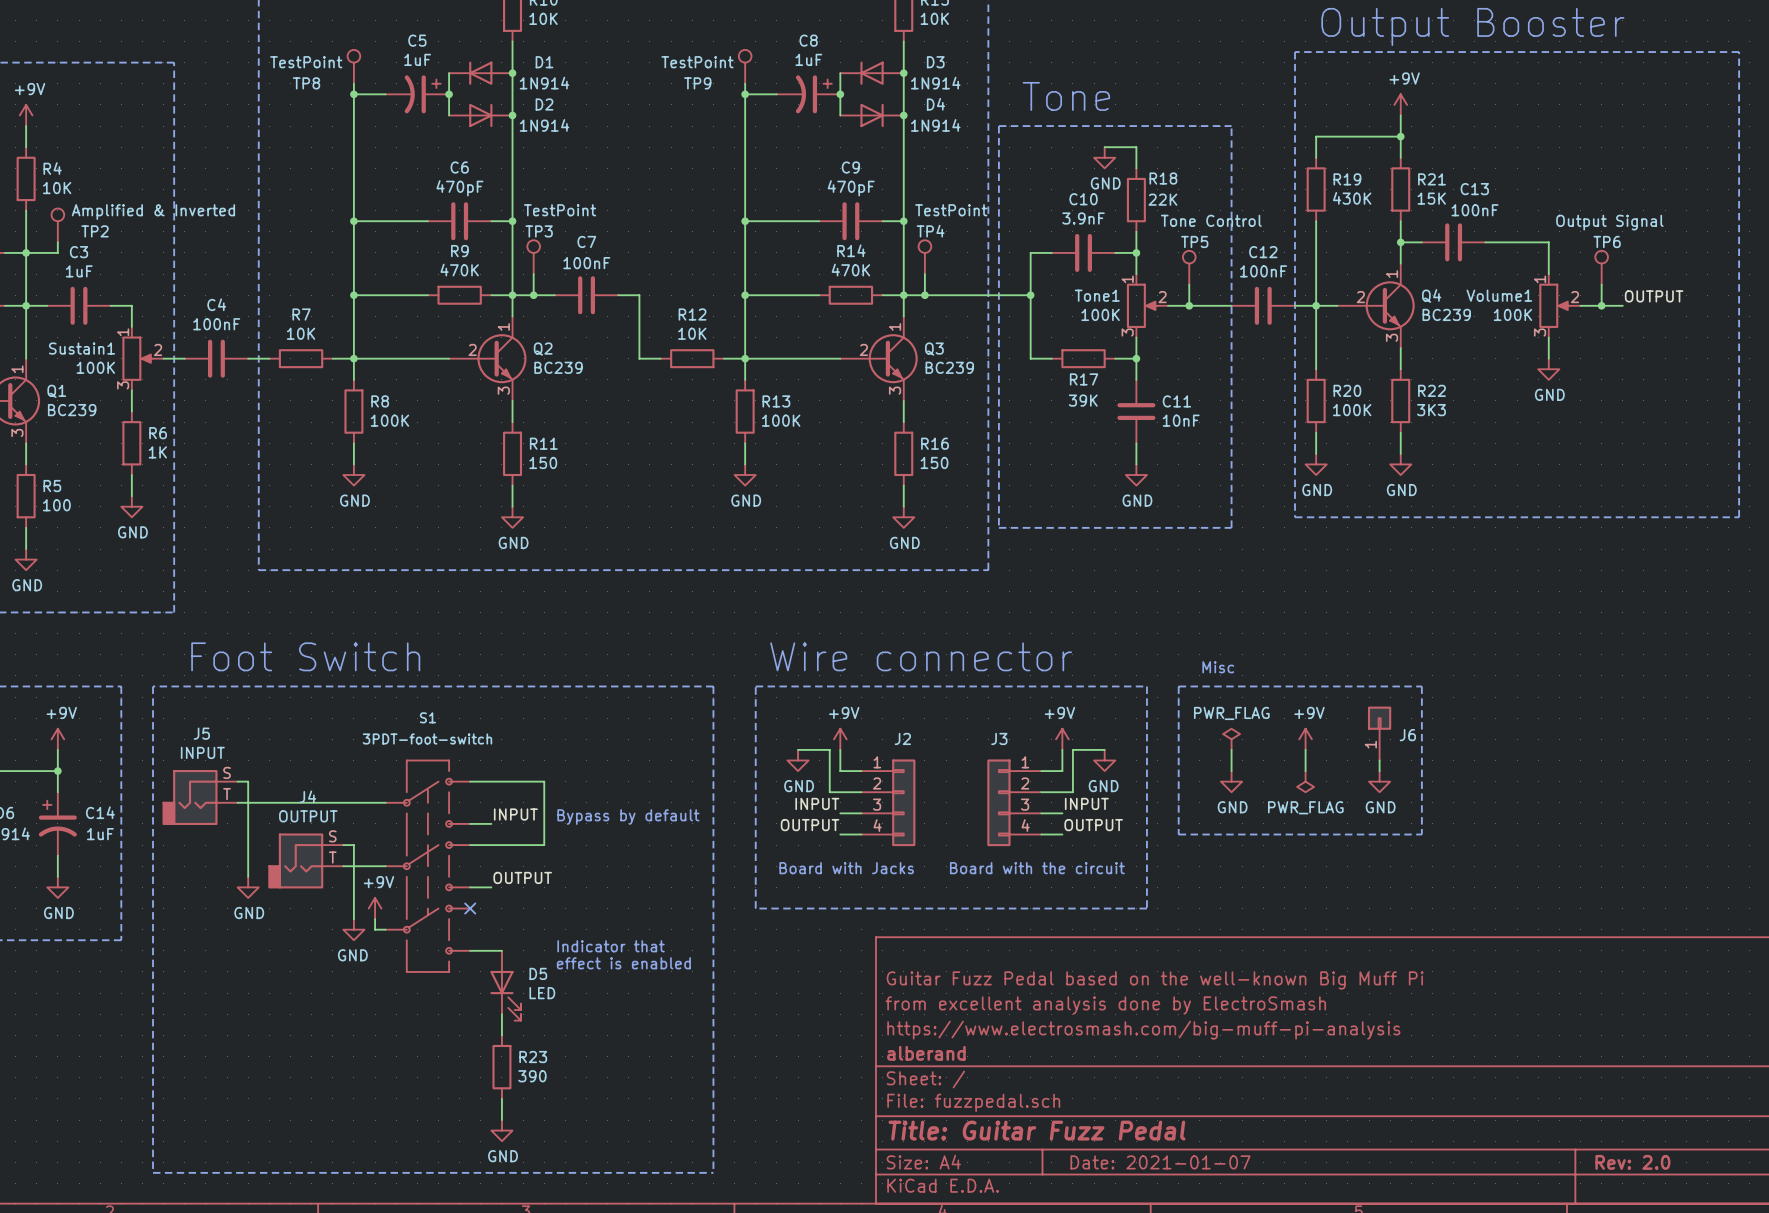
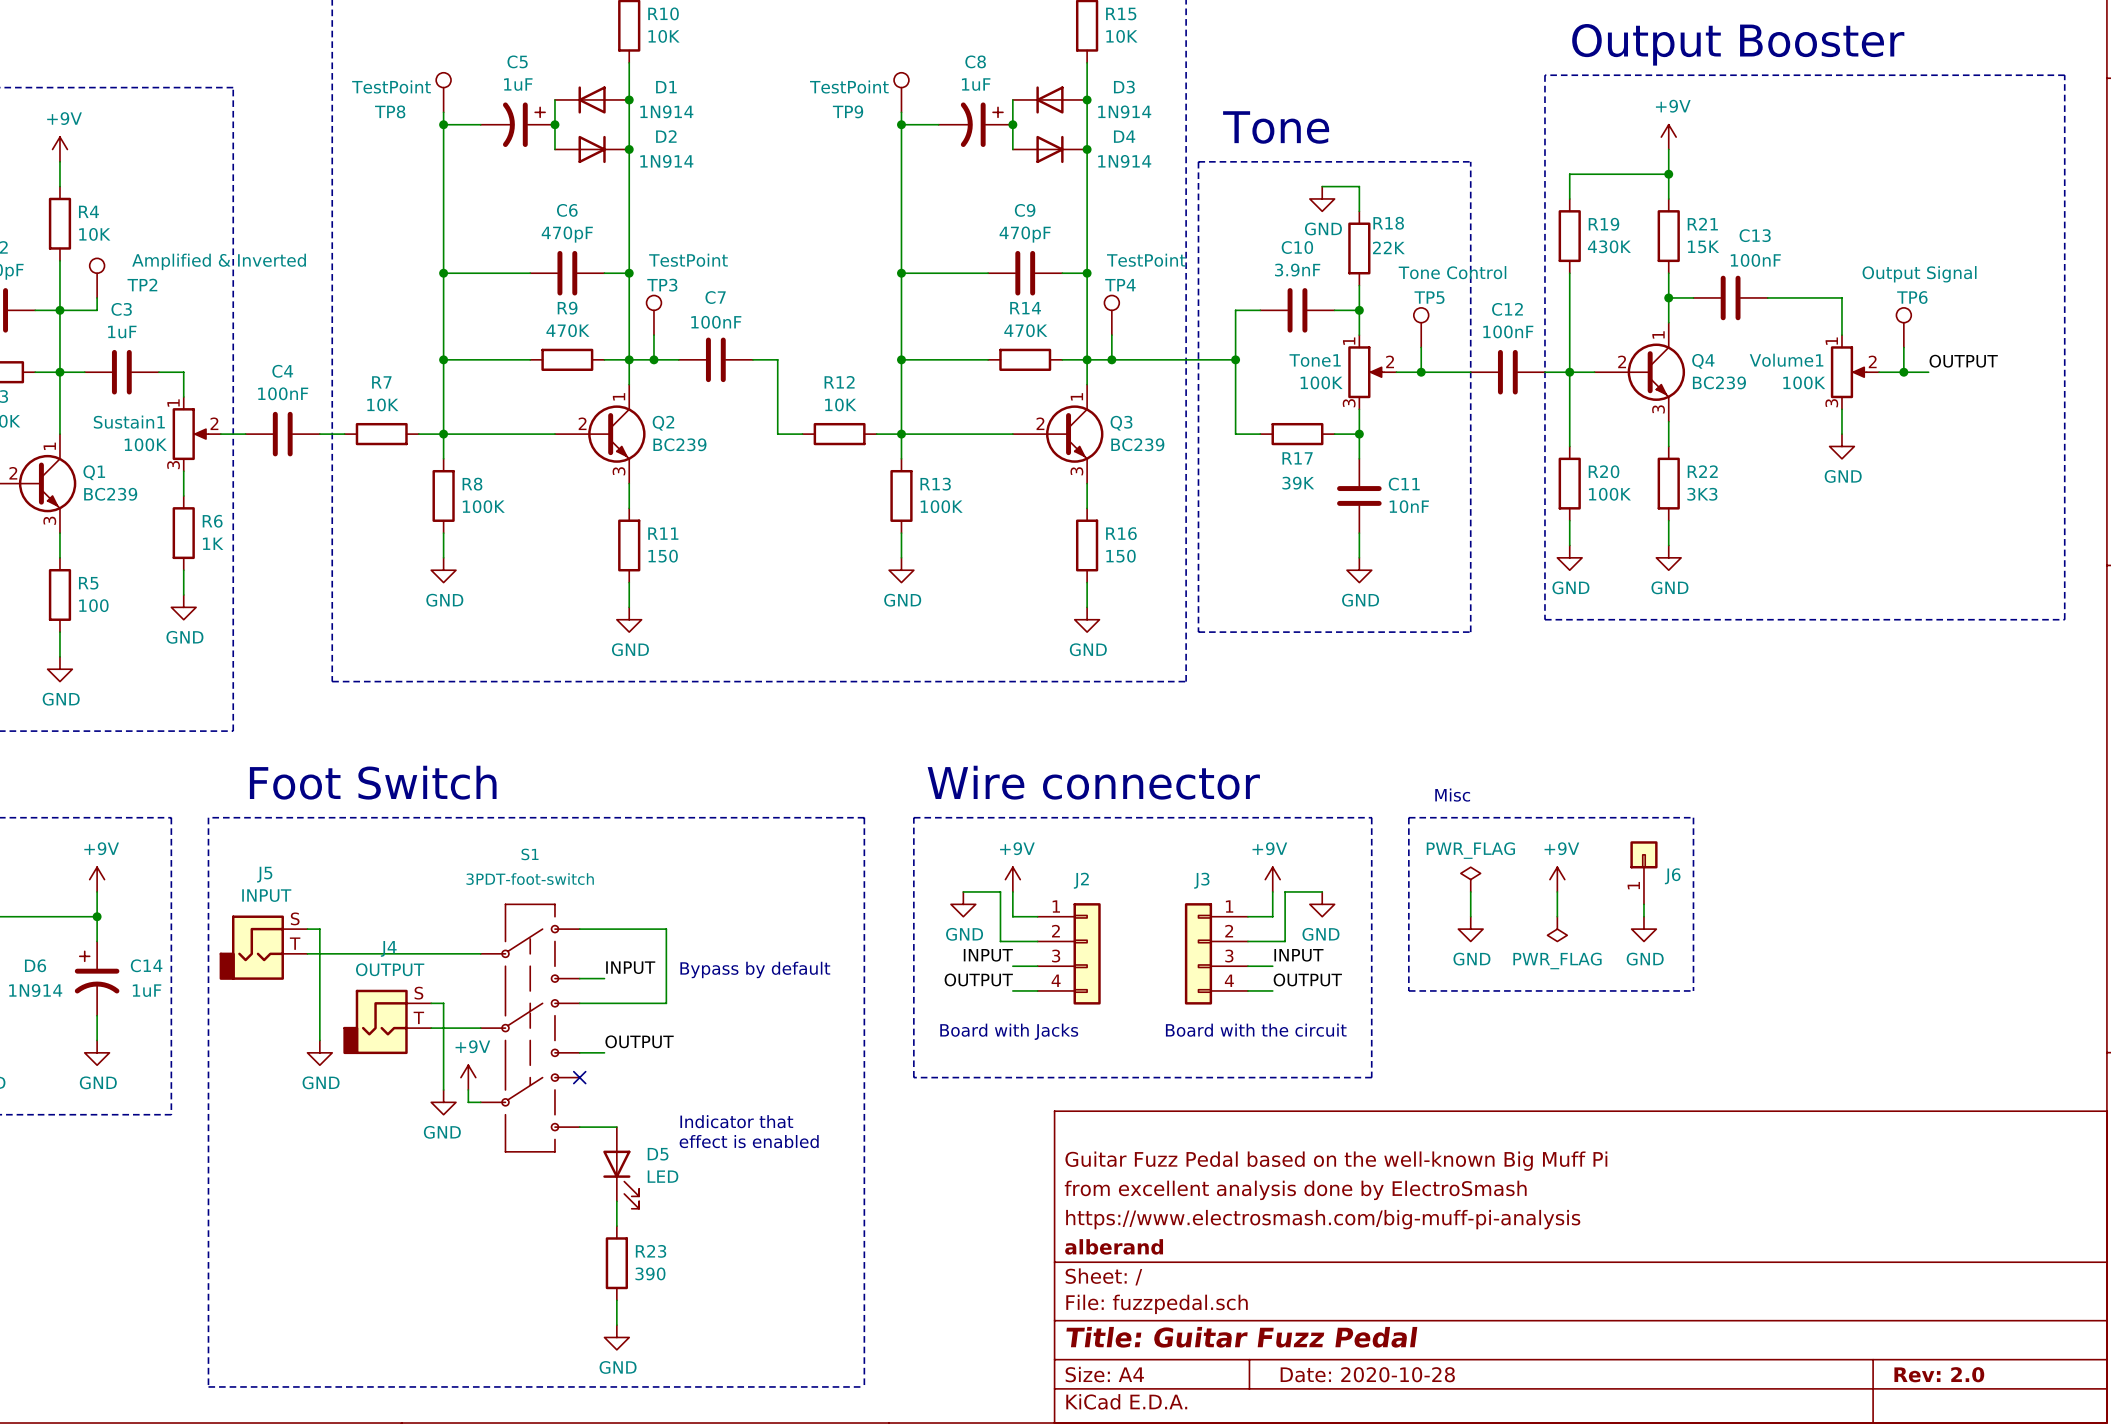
title block: Date: 2021-01-07 (1160, 1162) -> Date: 2020-10-28 (1367, 1374)

